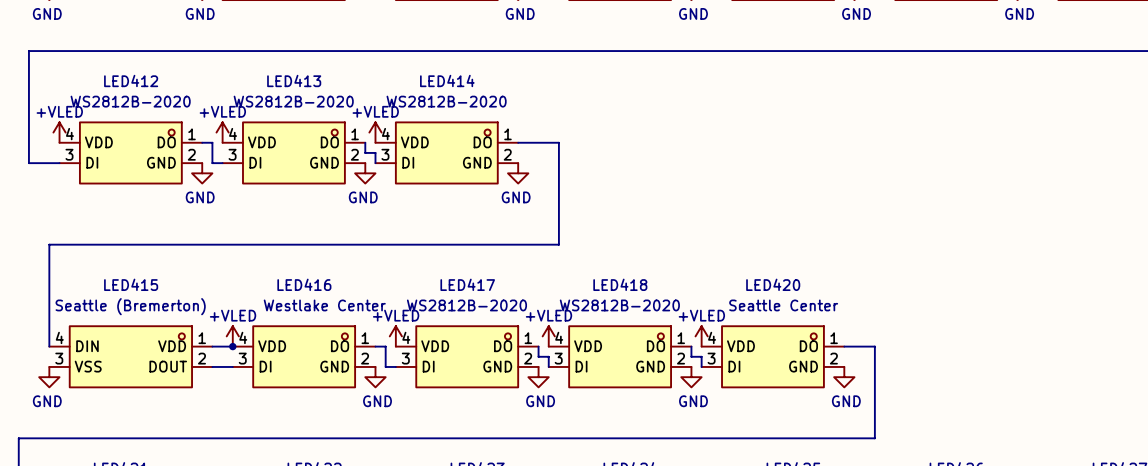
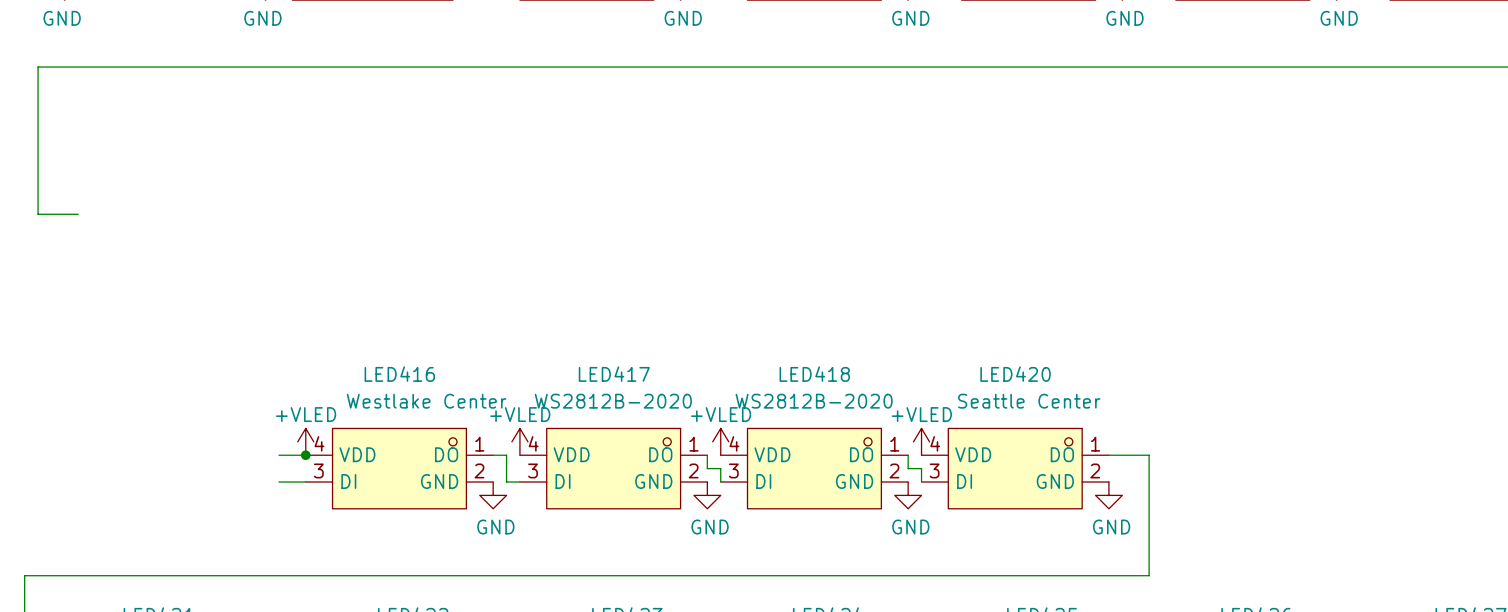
power symbol: +VLED (59, 132) -> none
power symbol: +VLED (222, 132) -> none
power symbol: +VLED (375, 132) -> none
wire: (202, 142) (212, 142) (212, 163) (222, 163) -> none
wire: (365, 142) (365, 152) (375, 152) (375, 163) -> none
wire: (518, 142) (558, 142) (558, 244) (49, 244) (49, 346) -> none
LED412: WS2812B-2020 (130, 152) -> none
LED413: WS2812B-2020 (293, 152) -> none
LED414: WS2812B-2020 (446, 152) -> none
power symbol: GND (202, 173) -> none
power symbol: GND (365, 173) -> none
power symbol: GND (518, 173) -> none
LED415: (130, 356) -> none
power symbol: GND (49, 377) -> none

